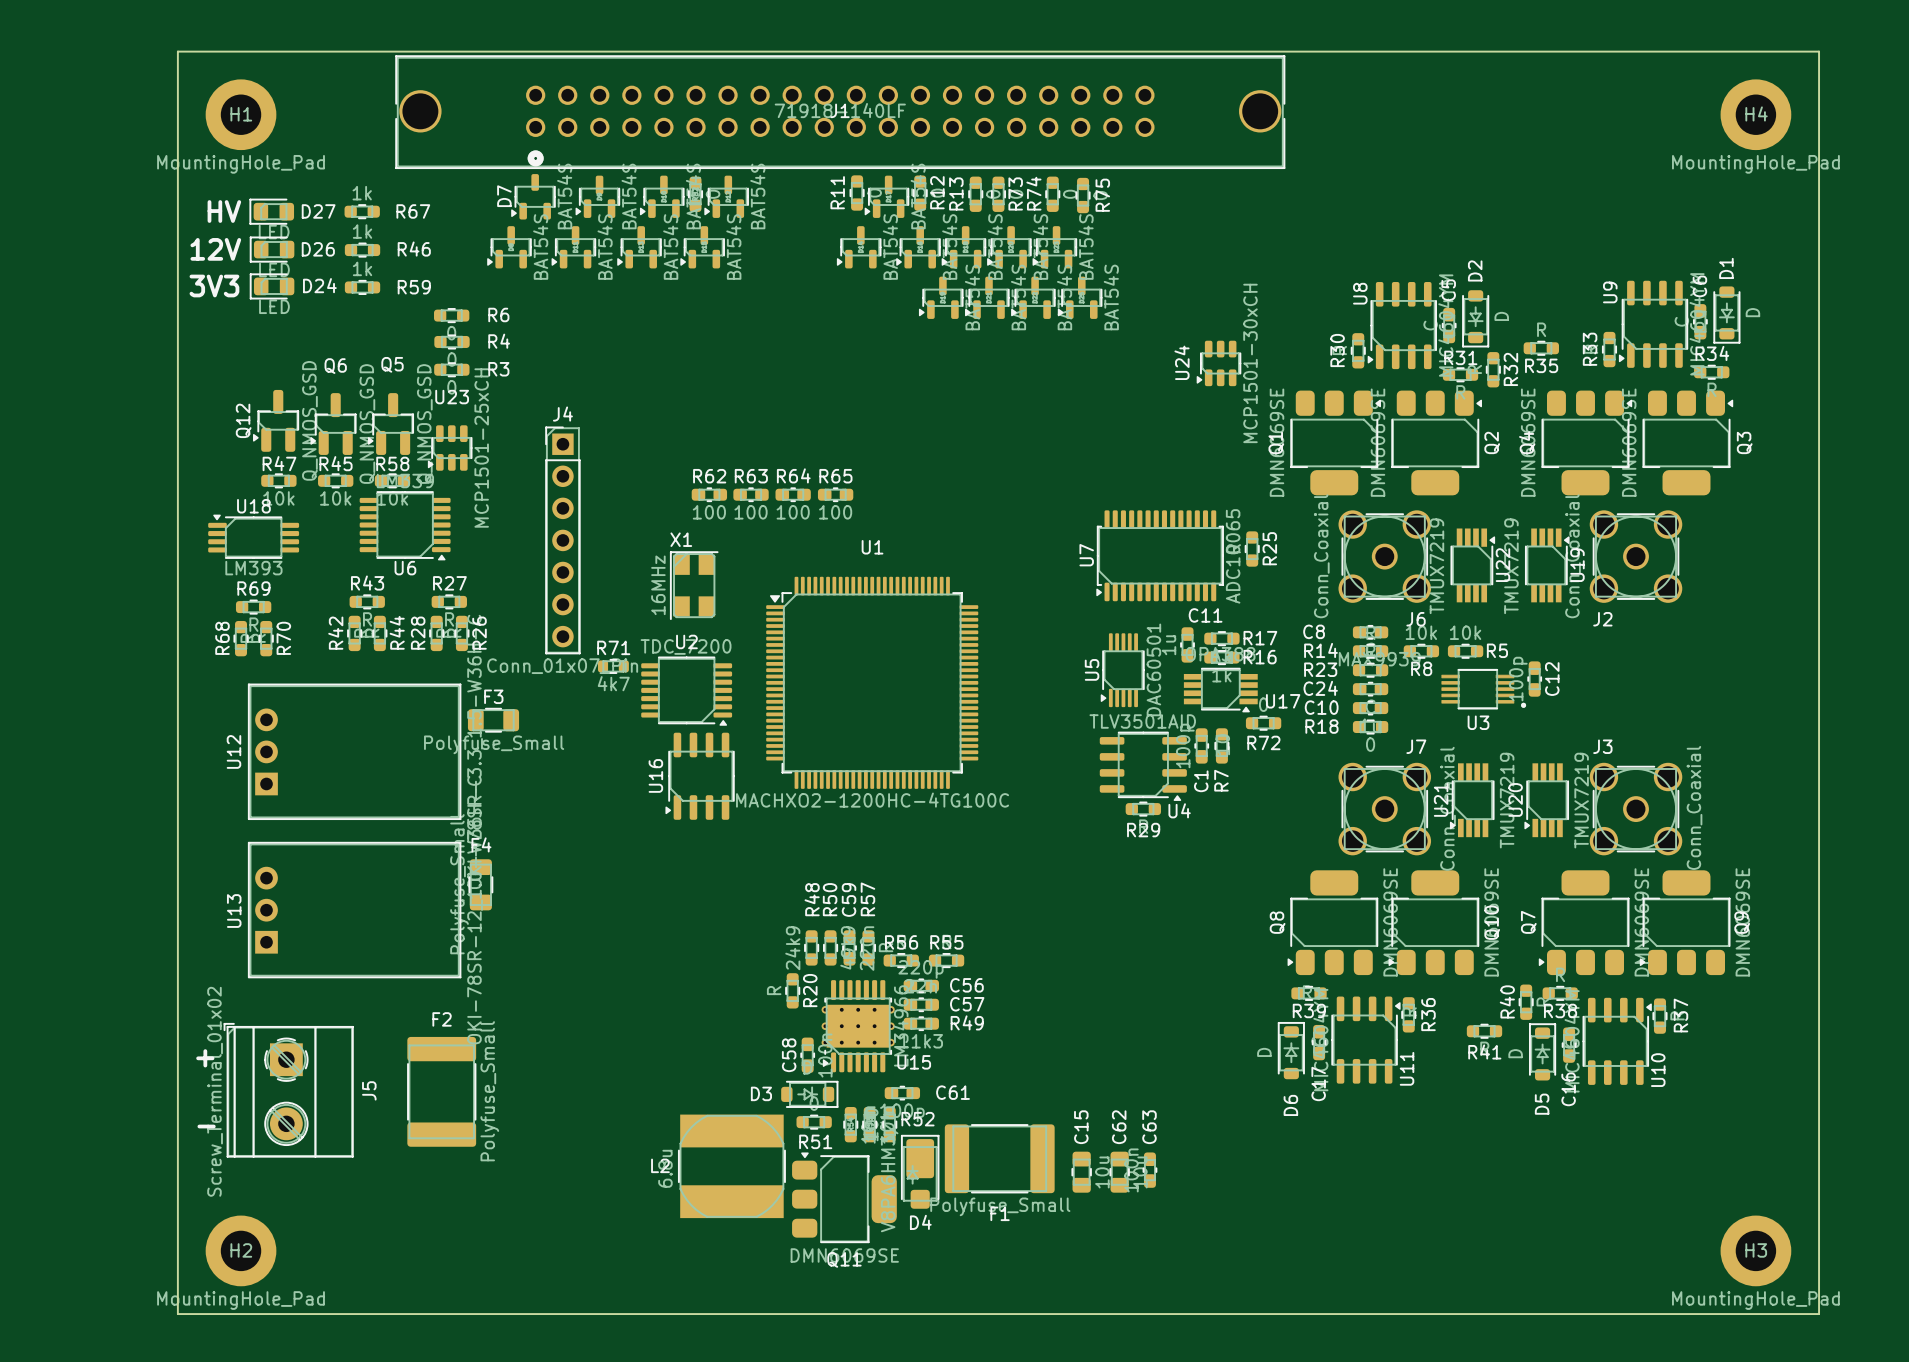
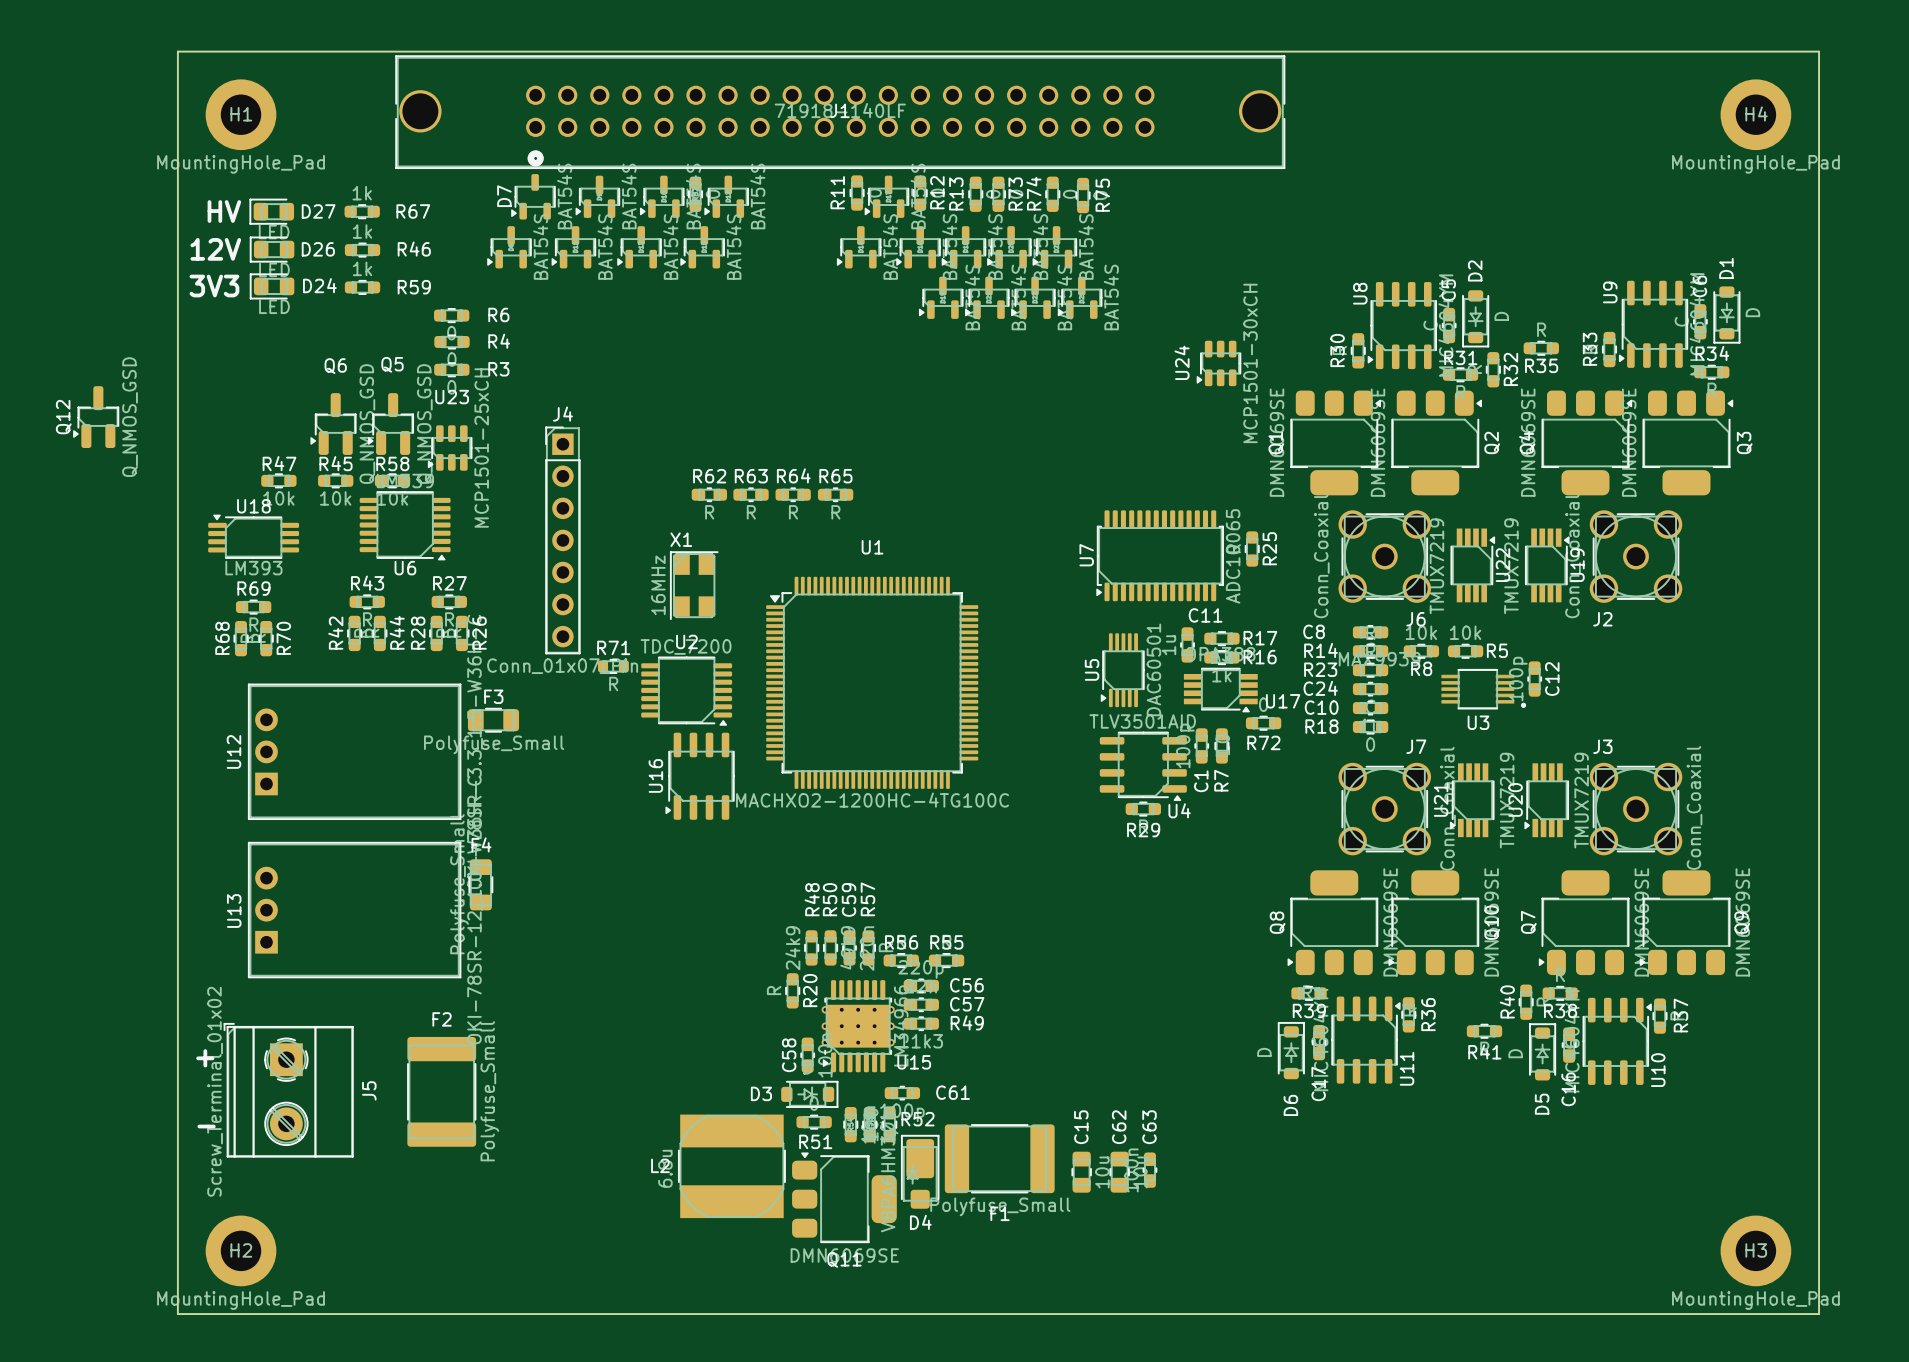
Q12 position: (275, 420) -> (96, 417)
R62 value: 100 (709, 512) -> R (709, 512)
R63 value: 100 (751, 512) -> R (751, 512)
R64 value: 100 (793, 512) -> R (793, 512)
R65 value: 100 (835, 512) -> R (835, 512)
R71 value: 4k7 (613, 683) -> R (613, 683)

